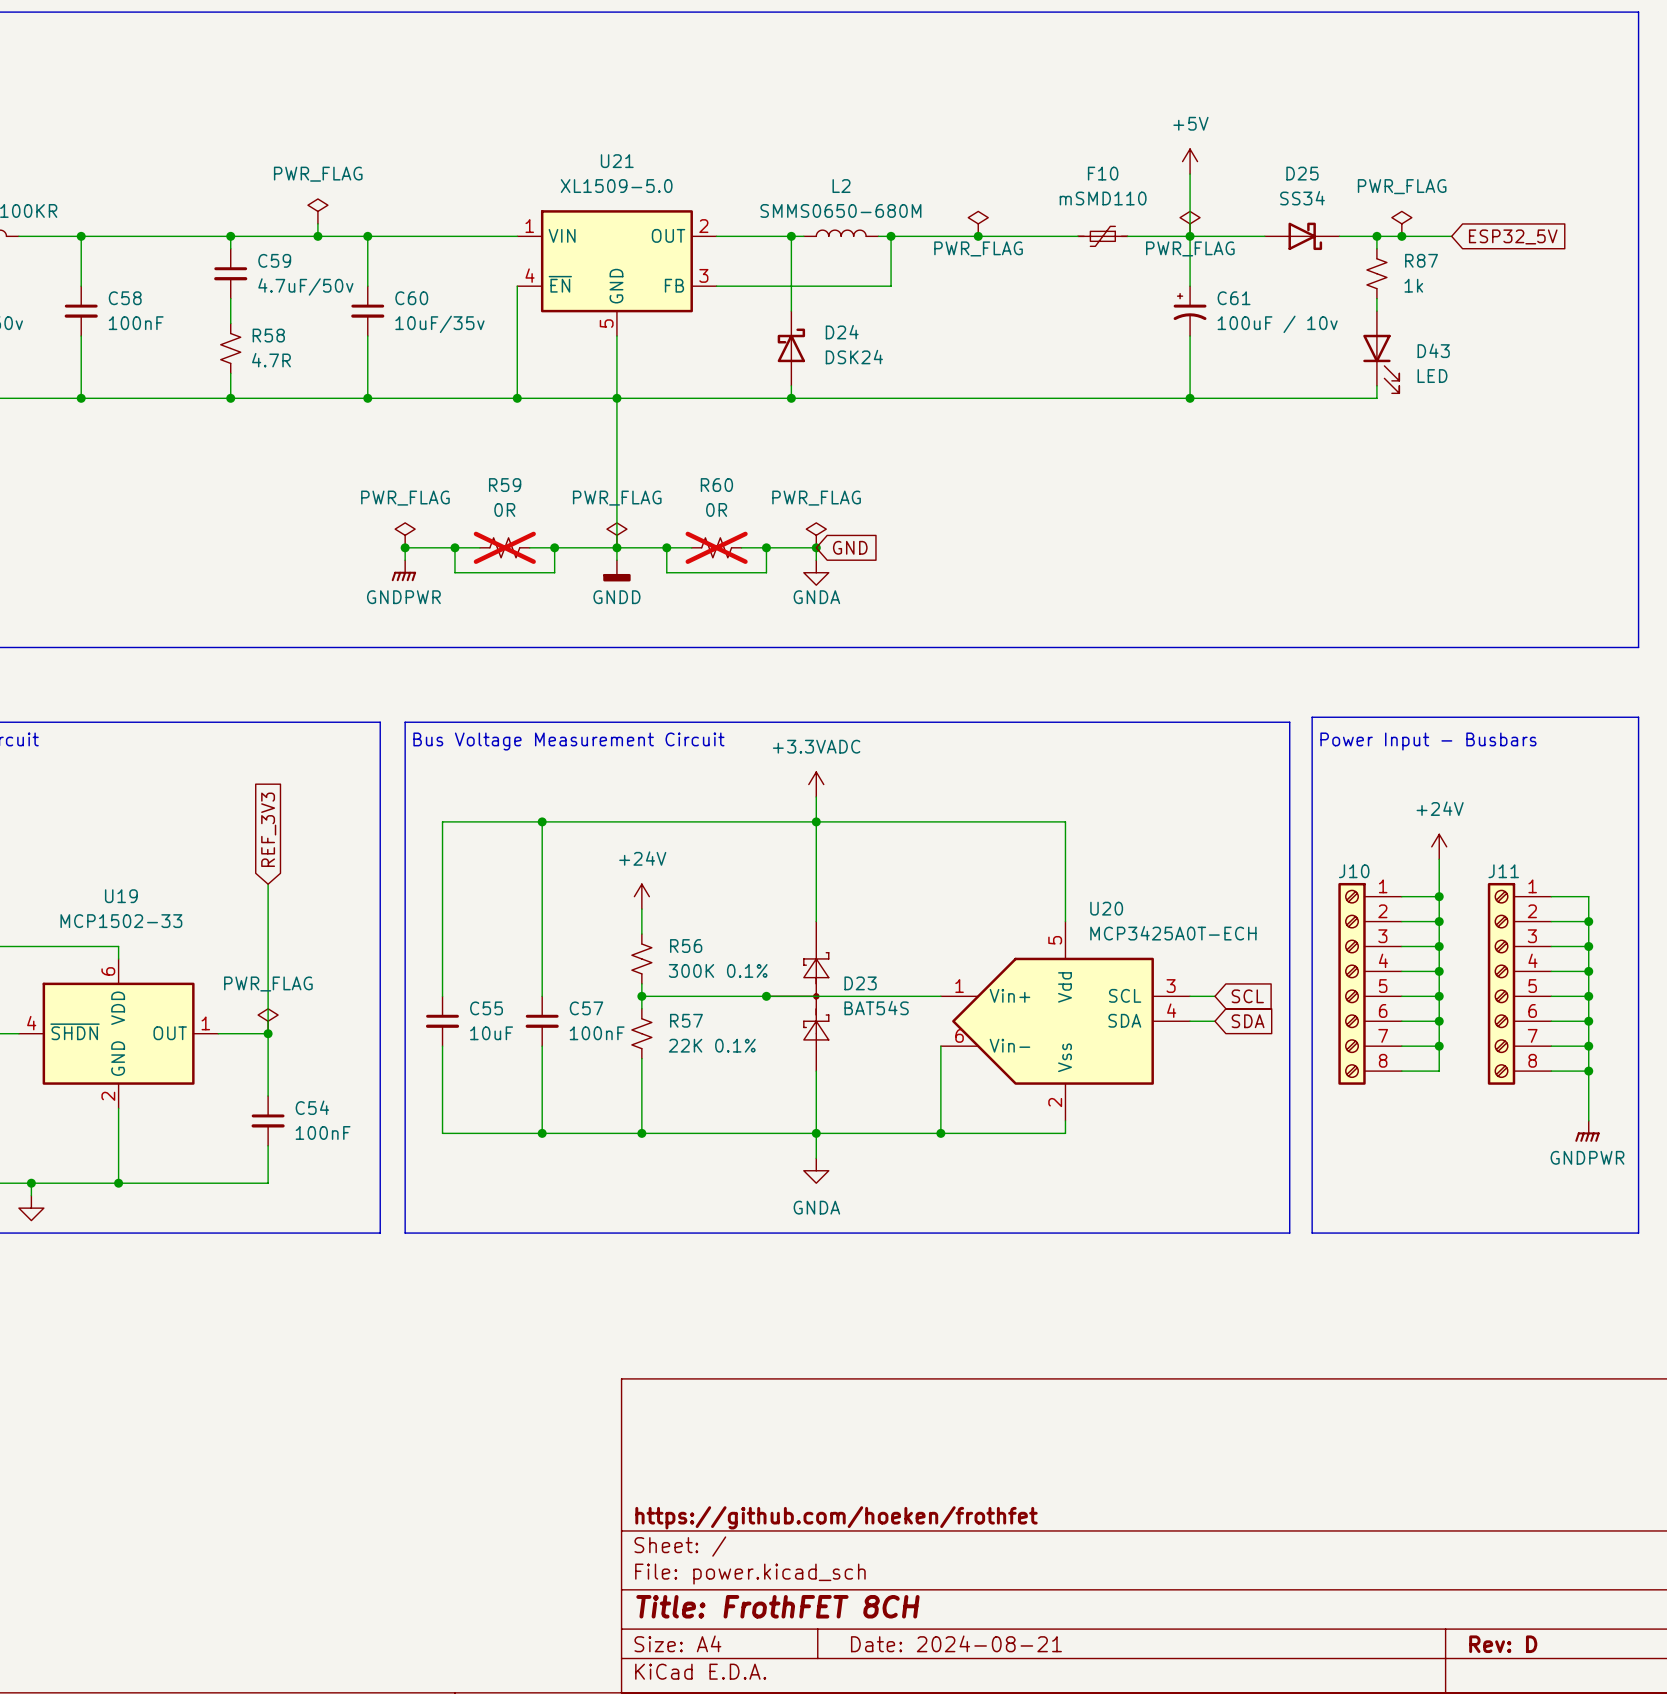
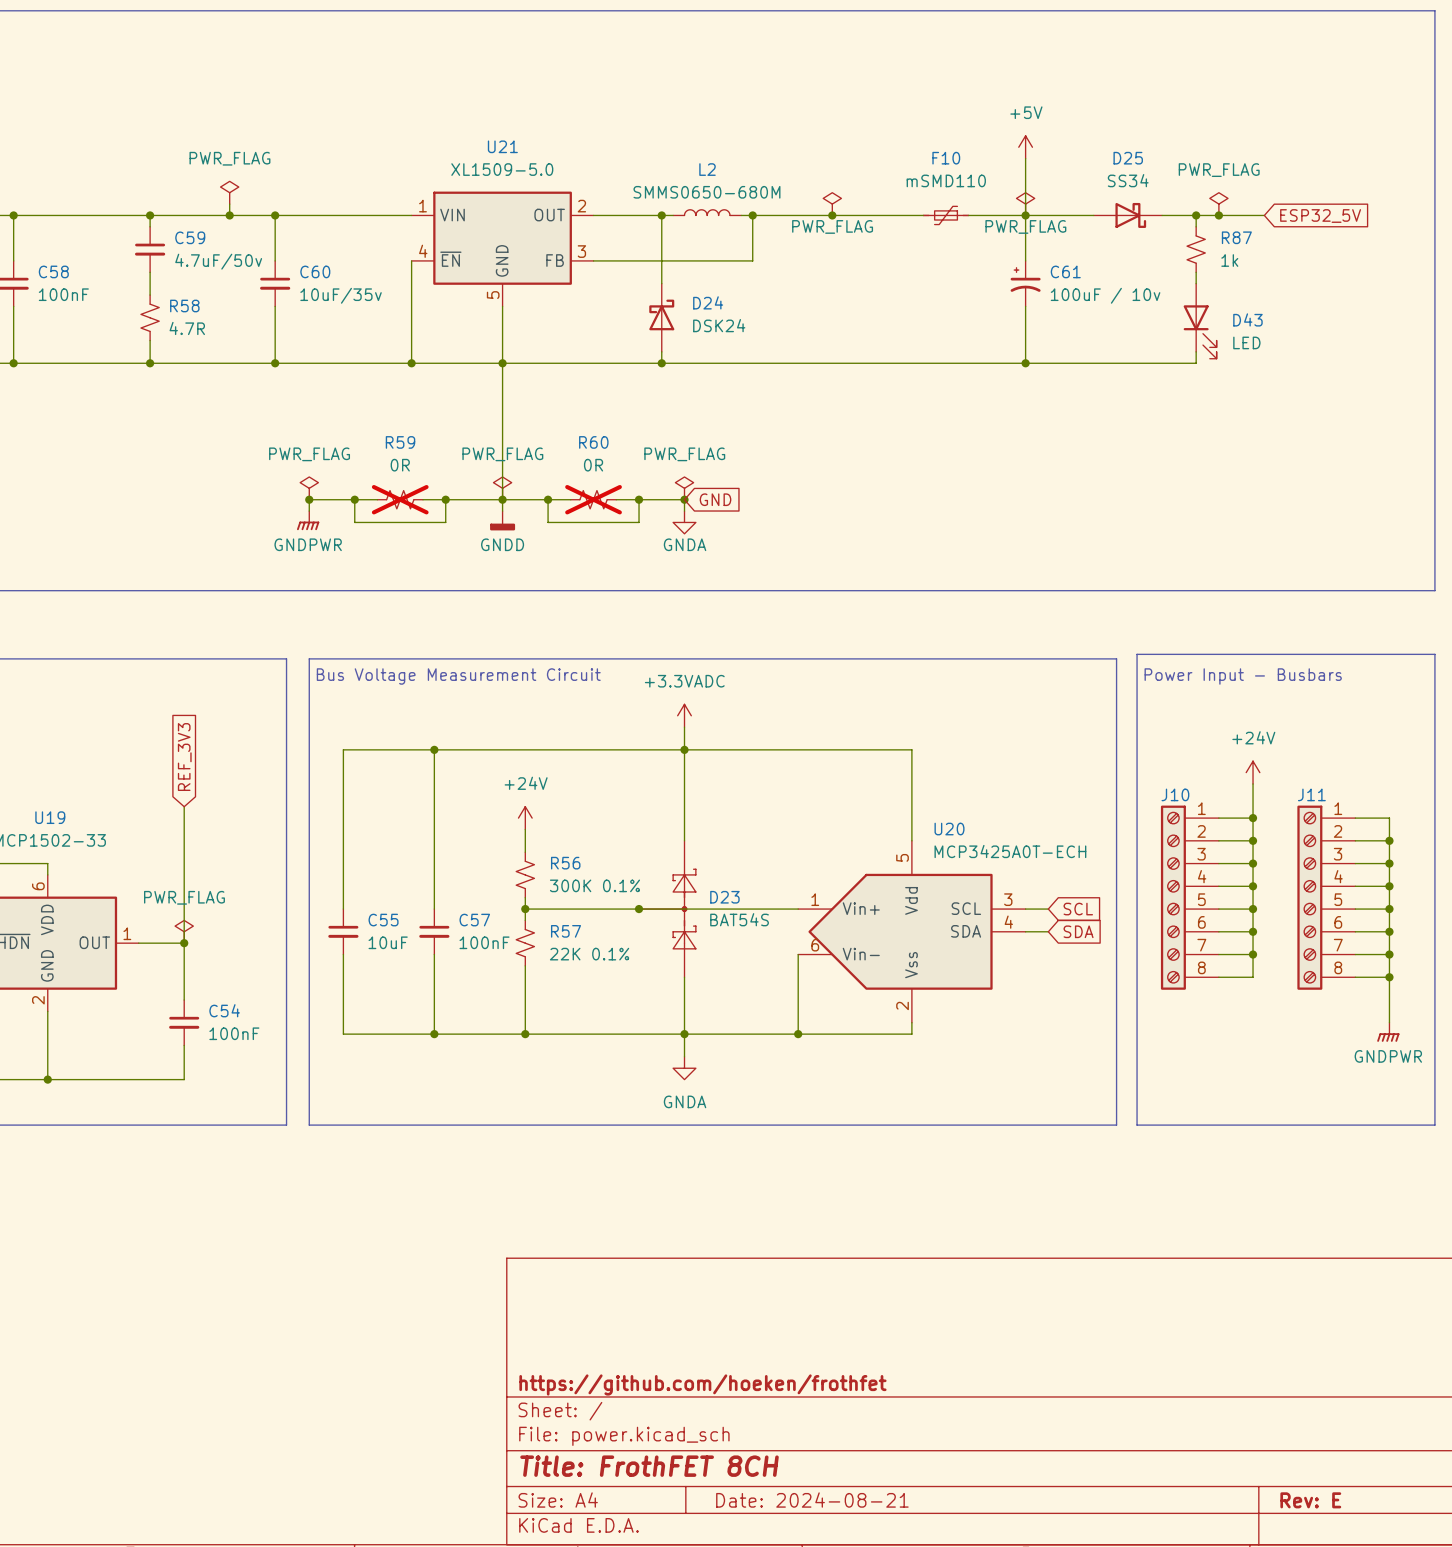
title block: Rev: D (1503, 1644) -> Rev: E (1310, 1500)

